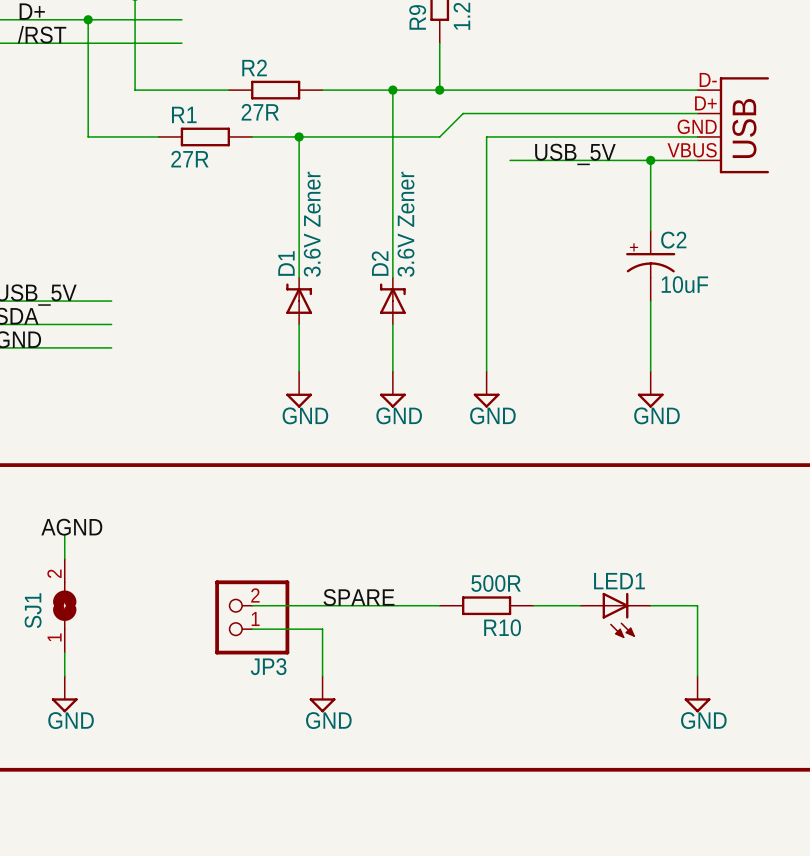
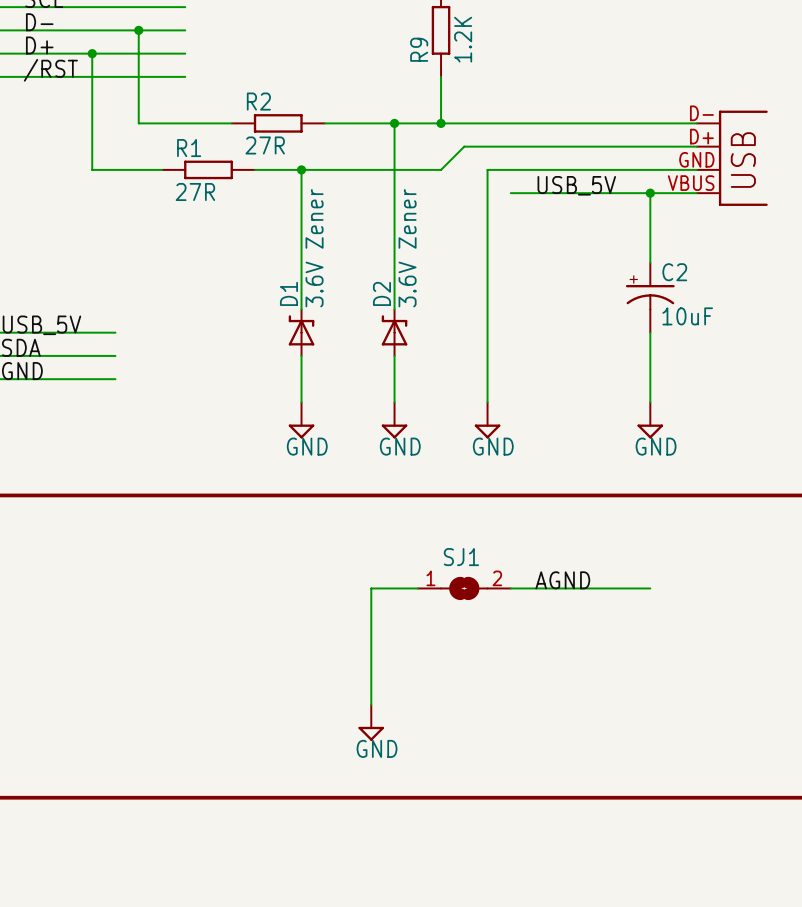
label: AGND (71, 527) -> none
wire: (64, 535) (64, 558) -> none
label: none -> AGND (562, 580)
wire: none -> (417, 588) (371, 588) (371, 704)
wire: none -> (510, 588) (650, 588)
label: SPARE (358, 597) -> none
SJ1 rotation: 0° (64, 605) -> 90° clockwise (464, 588)
SJ1 position: (64, 605) -> (464, 588)
wire: (252, 605) (439, 605) -> none
R10: 500R (486, 605) -> none
wire: (533, 605) (580, 605) -> none
wire: (650, 605) (697, 605) (697, 676) -> none
LED1: (615, 615) -> none
JP3: (252, 617) -> none
wire: (252, 629) (322, 629) (322, 676) -> none
wire: (64, 652) (64, 676) -> none
power symbol: GND (64, 694) -> none
power symbol position: GND (322, 694) -> GND (371, 722)
power symbol: GND (697, 694) -> none

